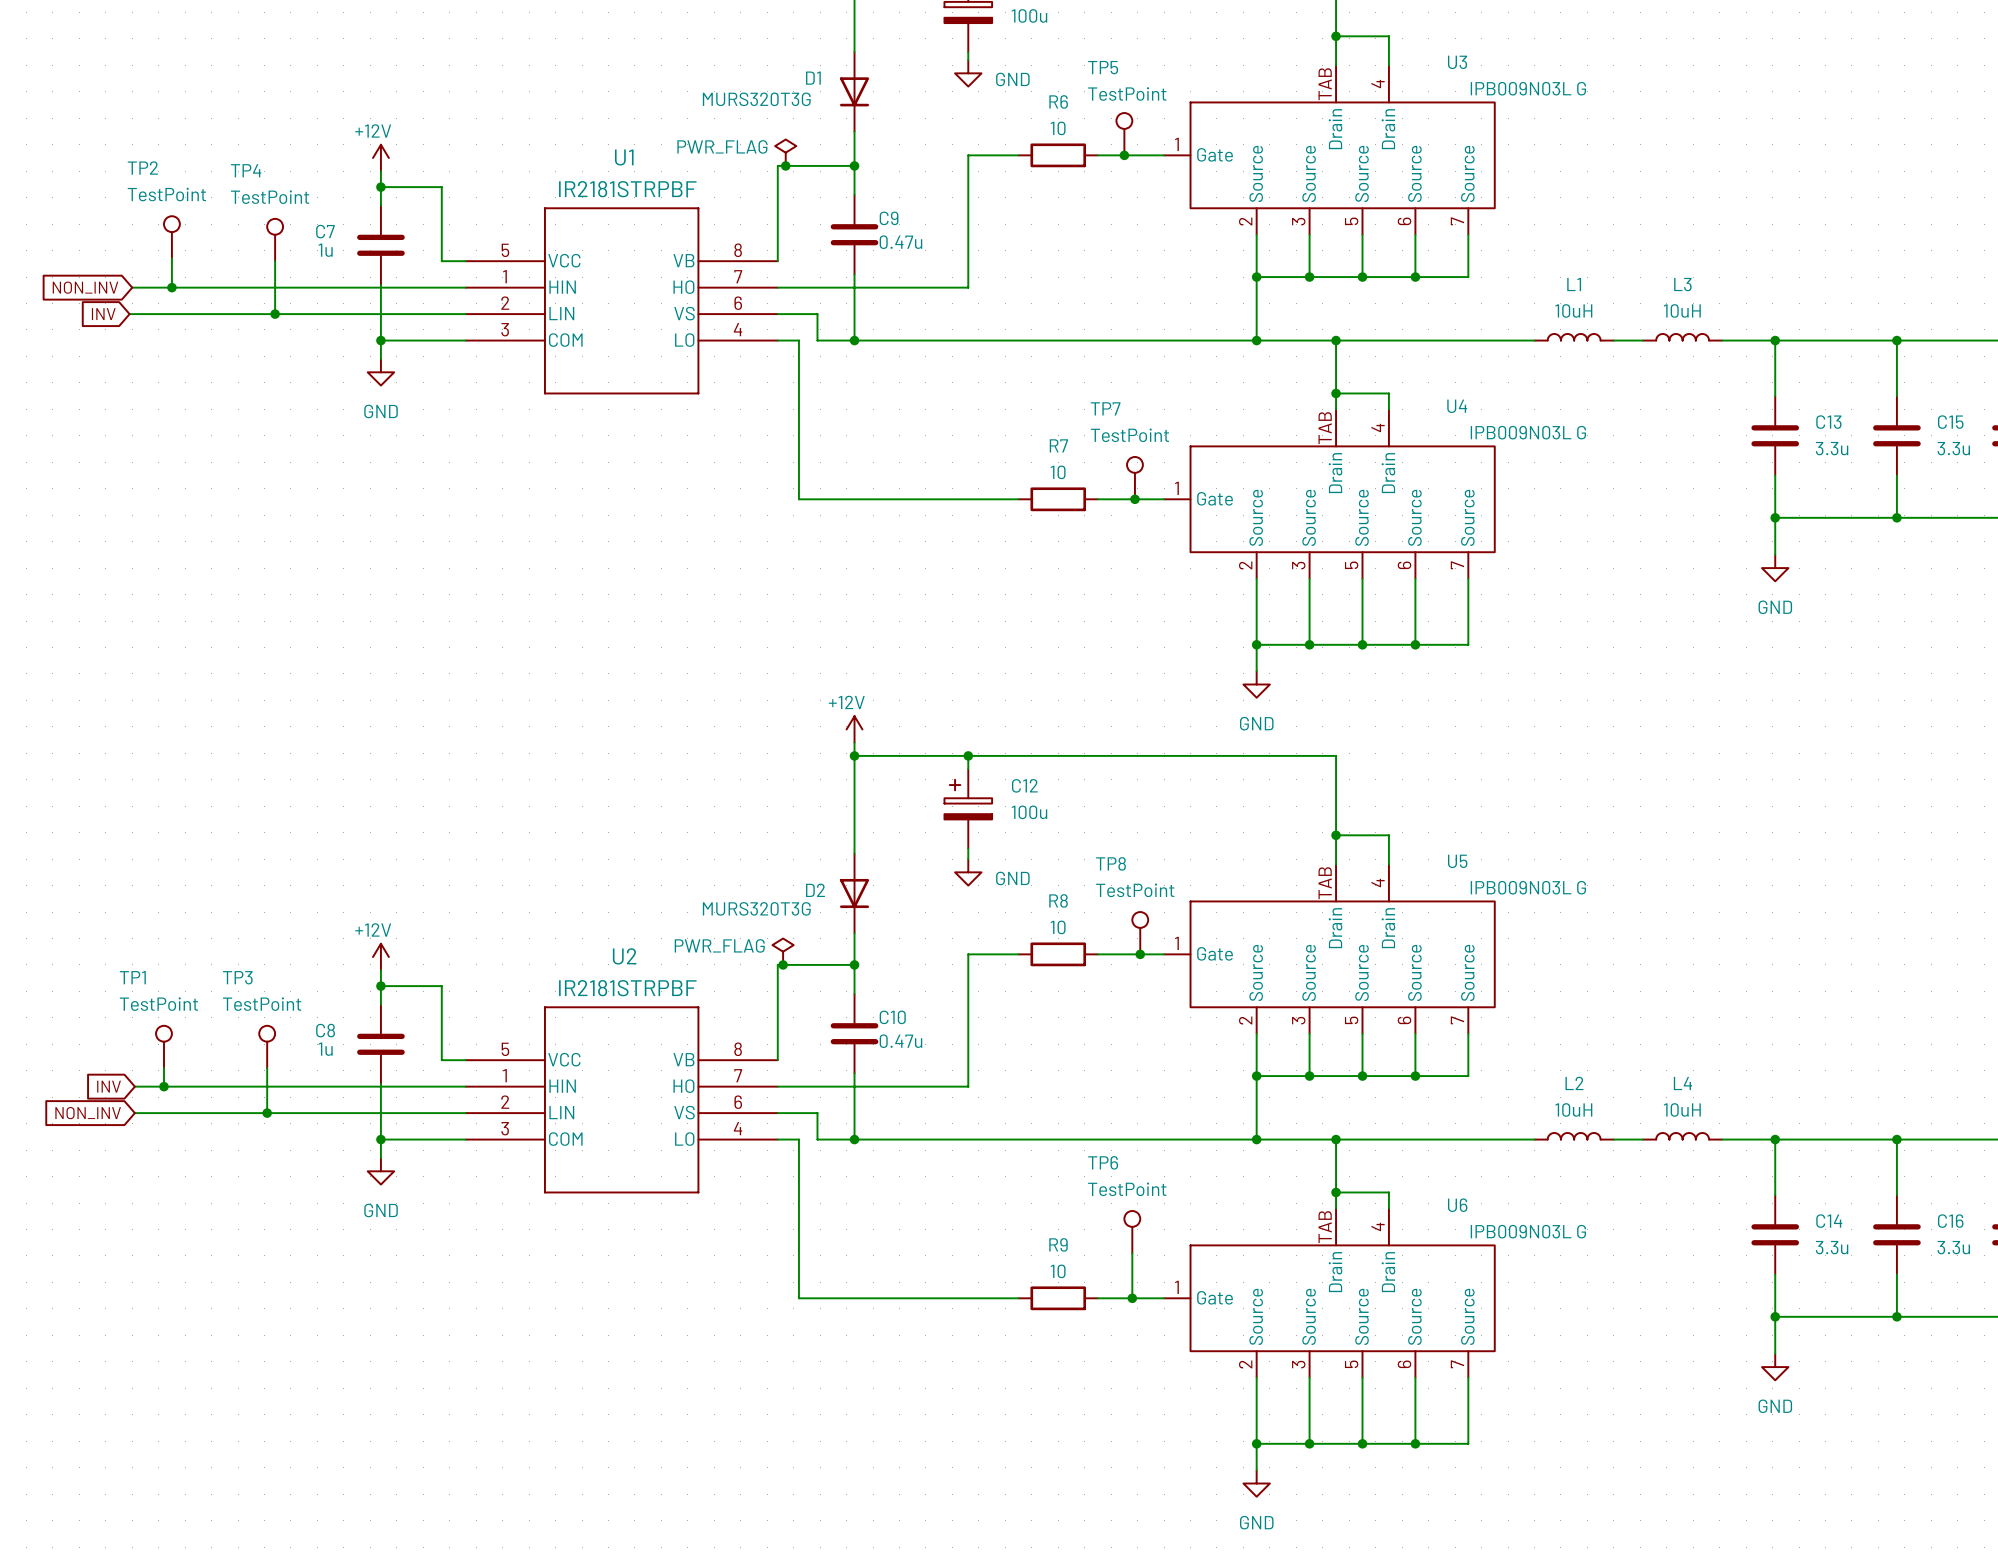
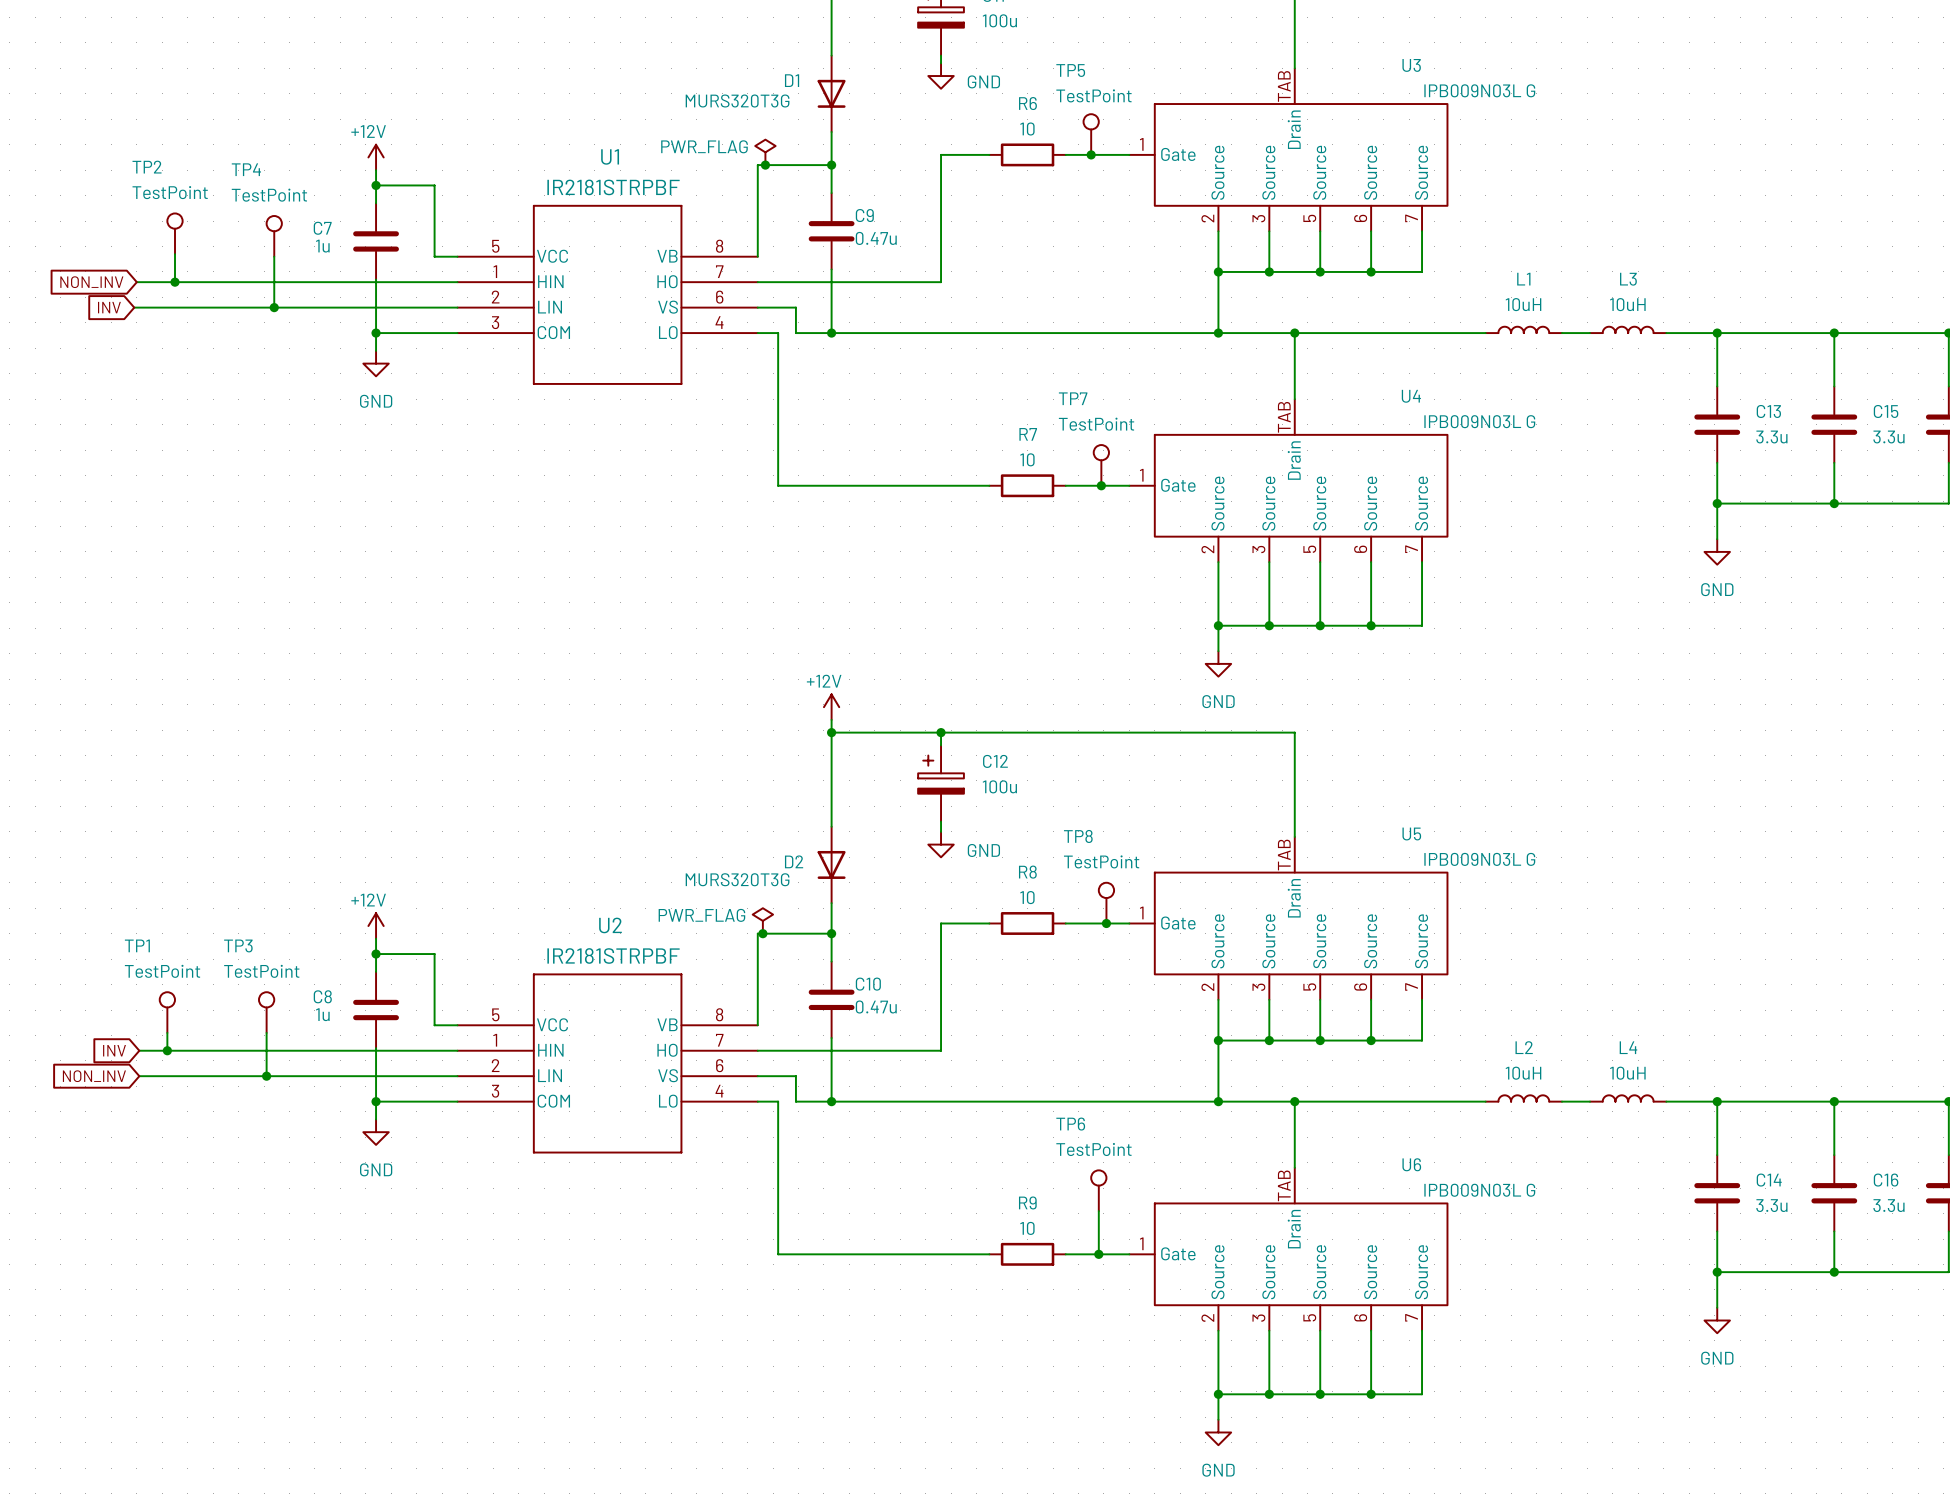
wire: (1336, 36) (1388, 36) (1388, 65) -> none
junction: (1336, 36) -> none
U3 symbol: [1164, 65, 1495, 235] -> [1129, 68, 1448, 232]
wire: (1336, 393) (1388, 393) (1388, 409) -> none
junction: (1336, 393) -> none
U4 symbol: [1164, 409, 1495, 579] -> [1129, 399, 1448, 563]
wire: (1336, 835) (1388, 835) (1388, 864) -> none
junction: (1336, 835) -> none
U5 symbol: [1164, 864, 1495, 1034] -> [1129, 836, 1448, 1000]
wire: (1336, 1192) (1388, 1192) (1388, 1208) -> none
junction: (1336, 1192) -> none
U6 symbol: [1164, 1208, 1495, 1378] -> [1129, 1167, 1448, 1331]

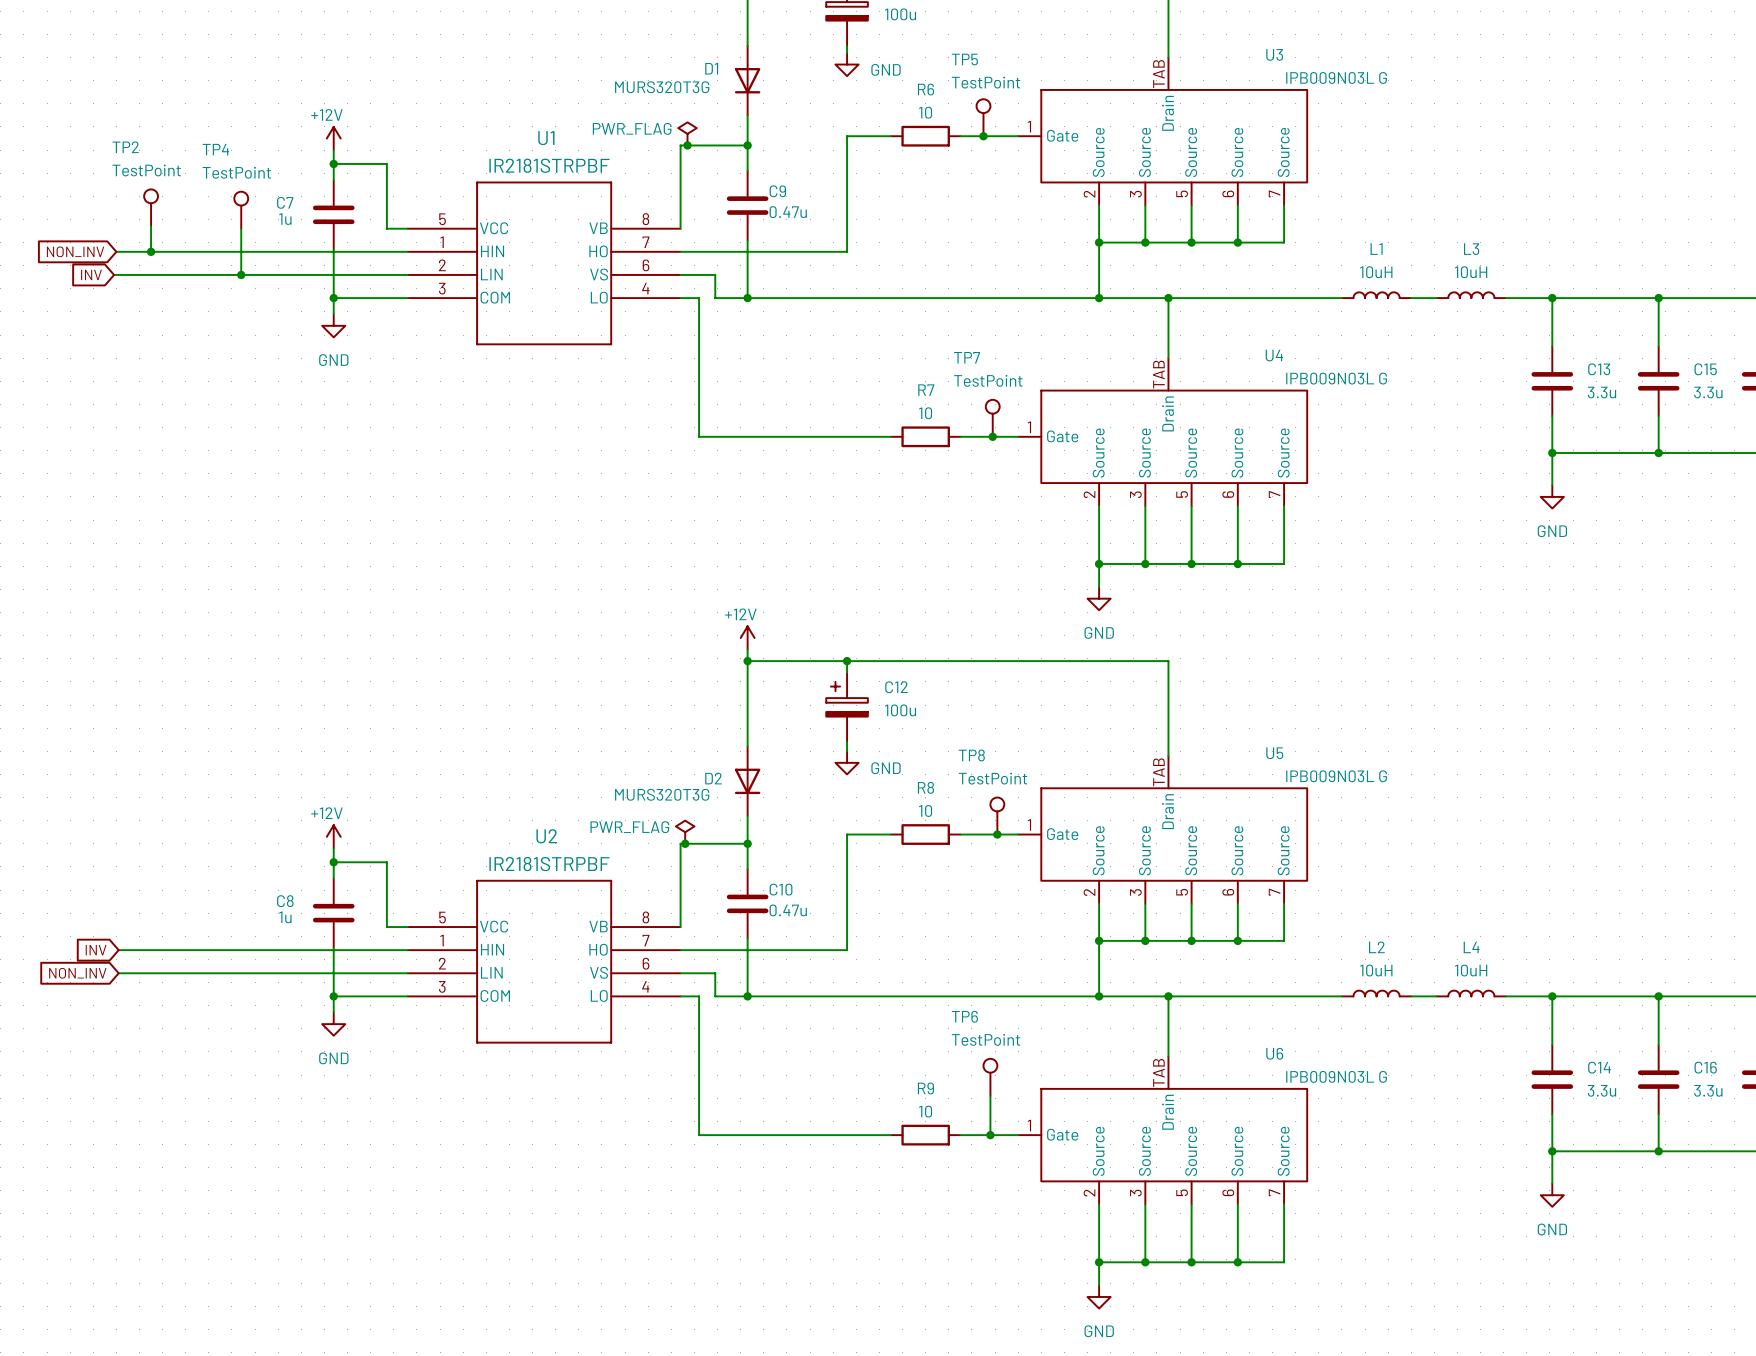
TP1: TestPoint (167, 1012) -> none
TP3: TestPoint (266, 1012) -> none
wire: (167, 1032) (167, 1050) -> none
wire: (266, 1032) (266, 1076) -> none
junction: (167, 1050) -> none
junction: (266, 1076) -> none

